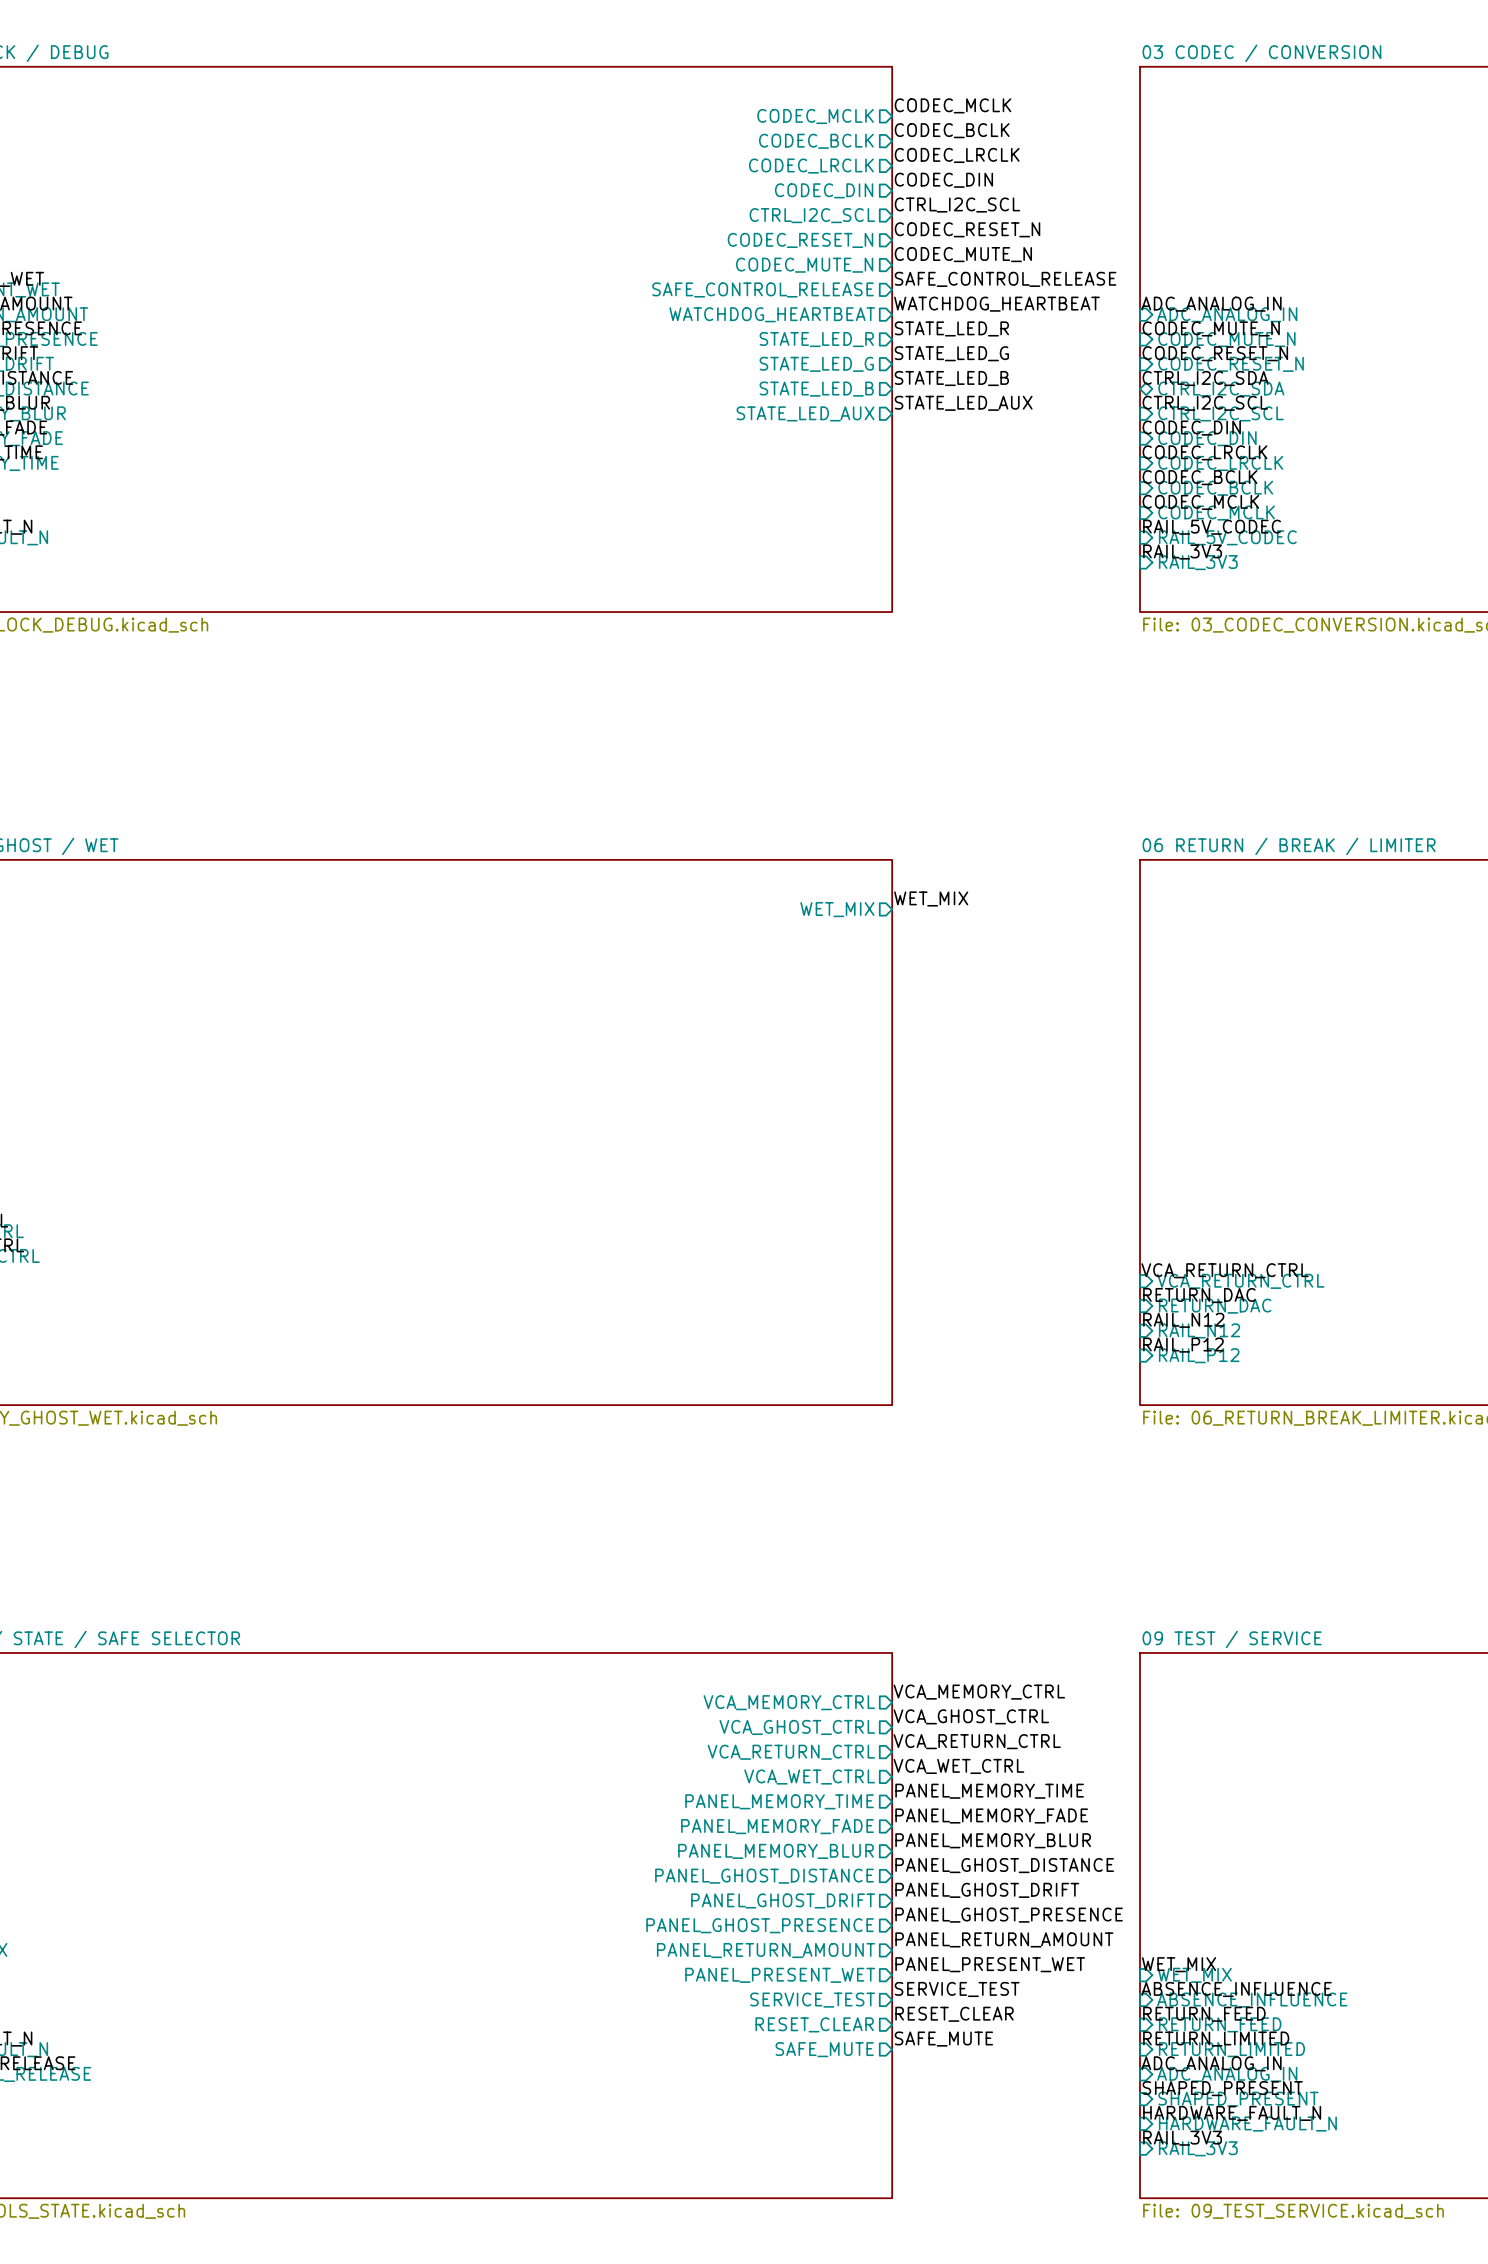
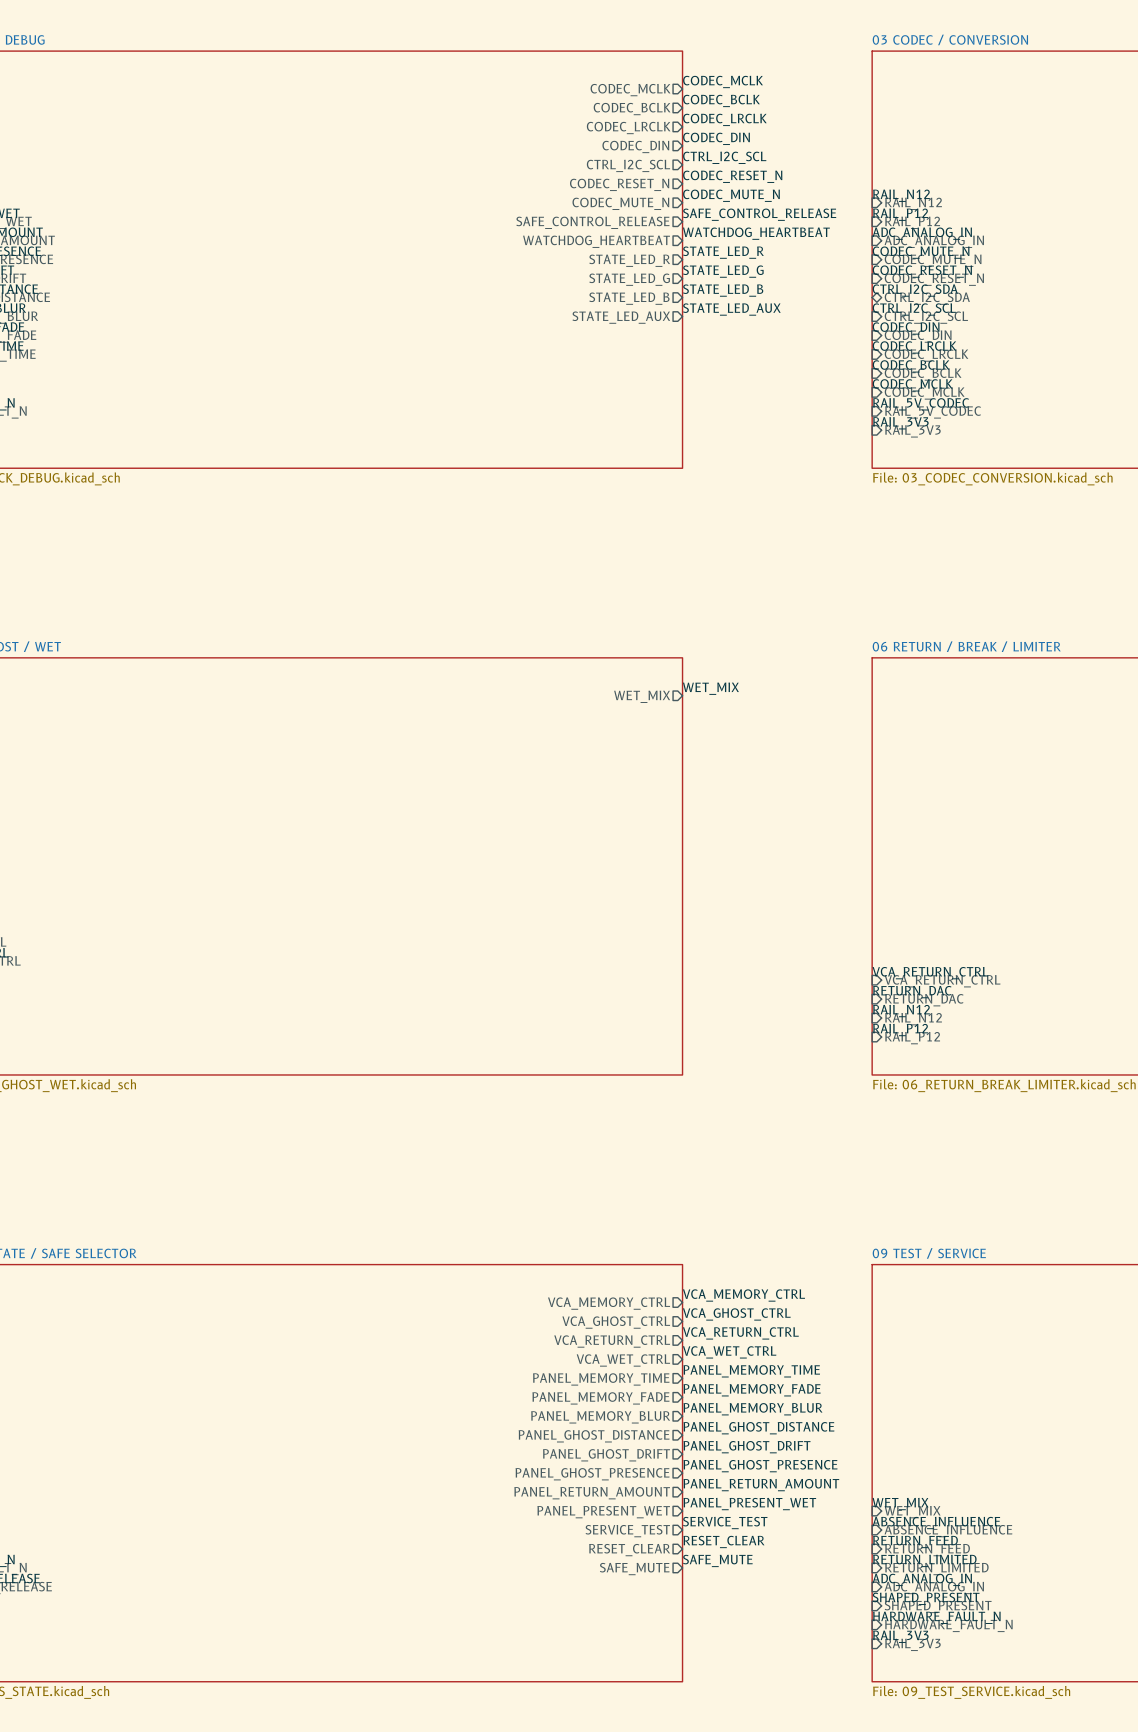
label: none -> RAIL_N12 (901, 195)
sheet pin: none -> RAIL_N12 (913, 203)
label: none -> RAIL_P12 (900, 214)
sheet pin: none -> RAIL_P12 (912, 222)

